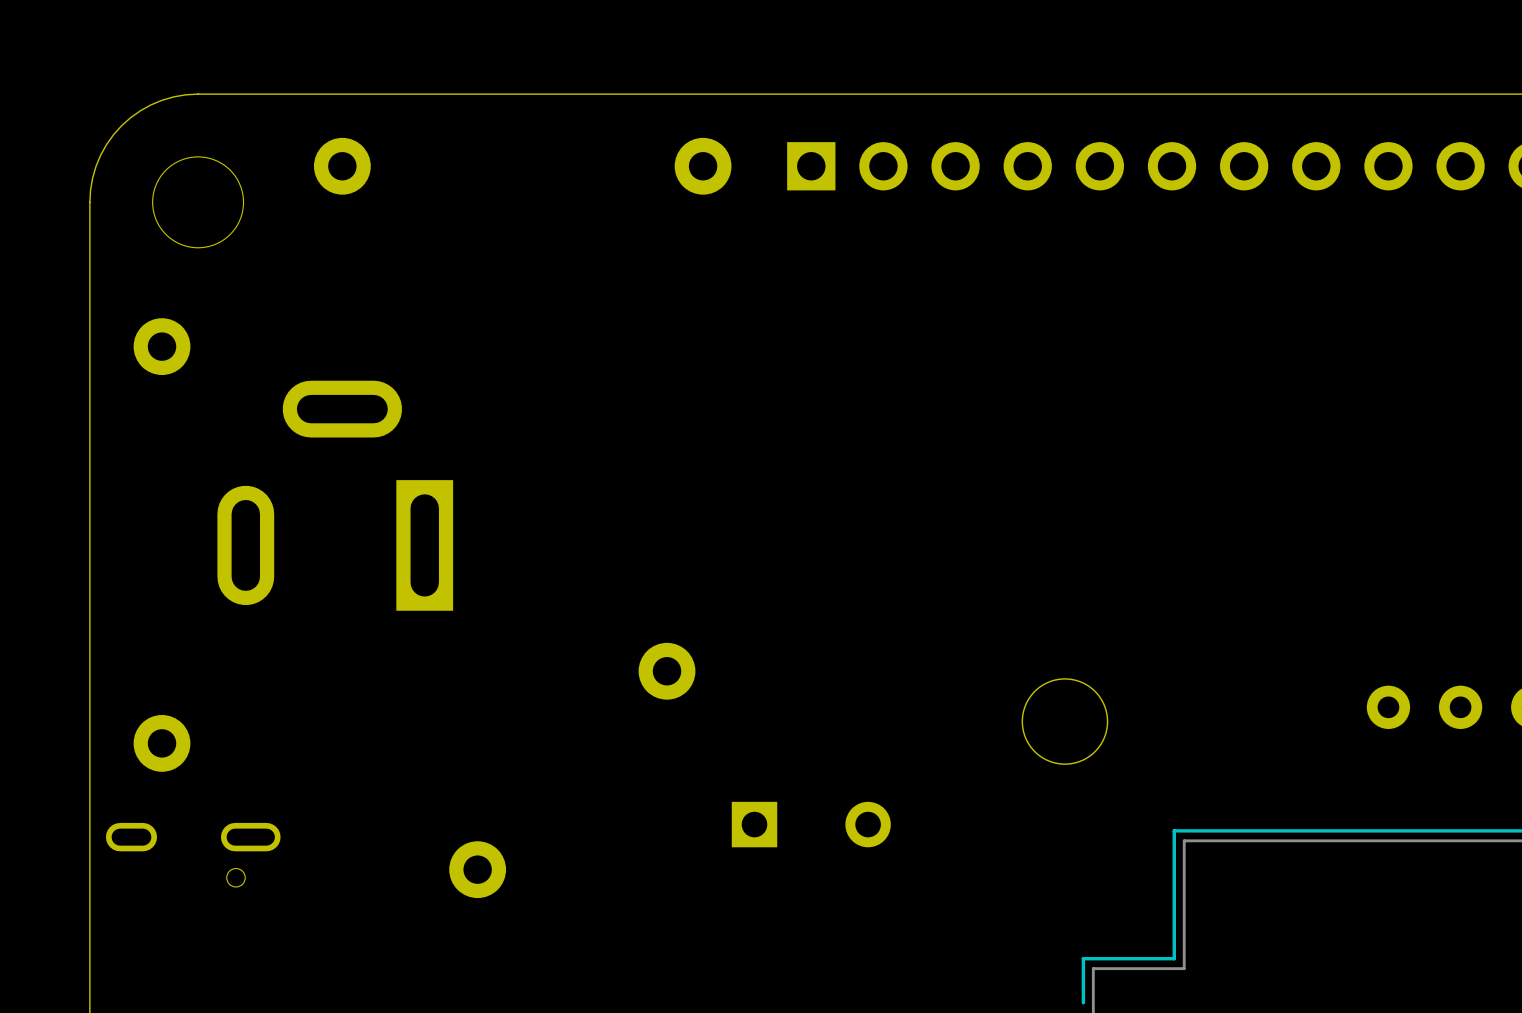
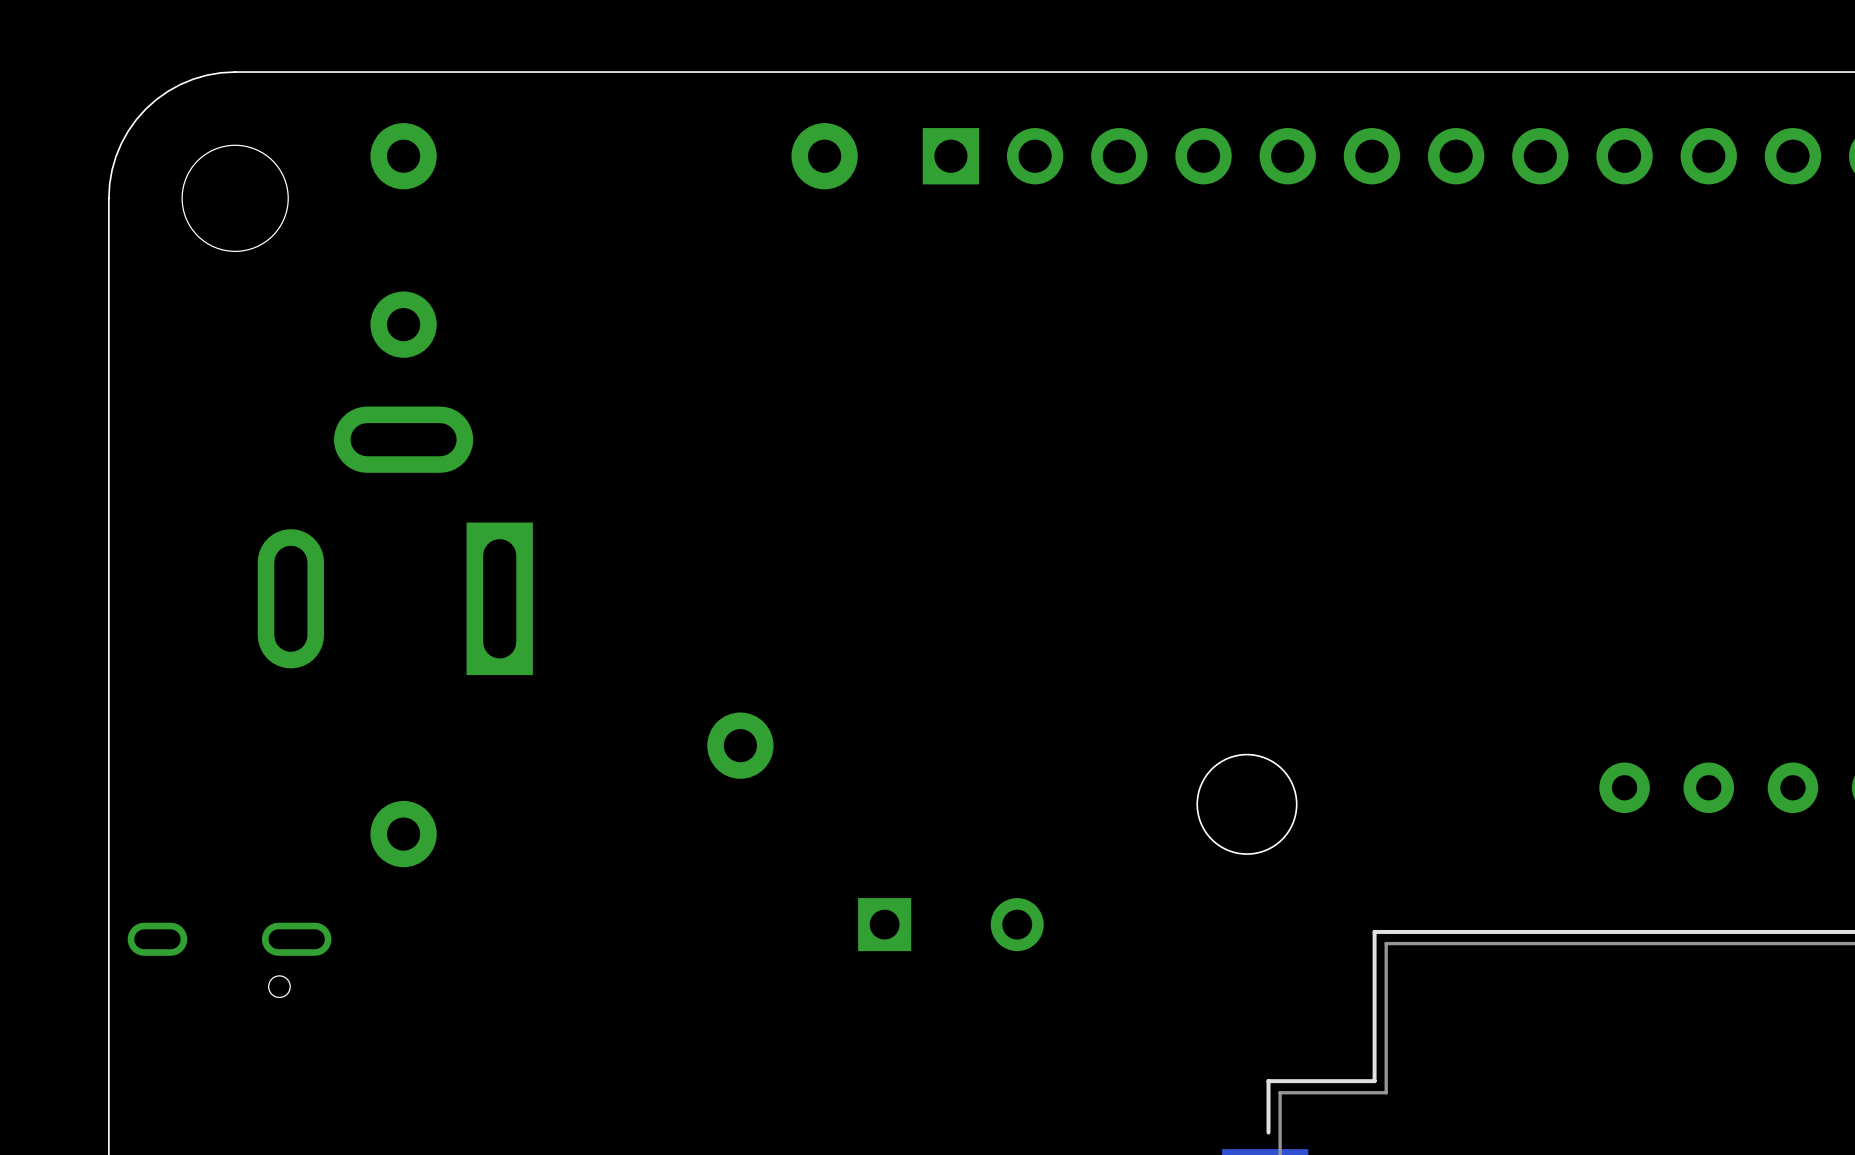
part position: (162, 346) -> (403, 324)
part position: (667, 671) -> (740, 745)
part: (162, 743) -> none
part: none -> (403, 834)
part: (477, 869) -> none

